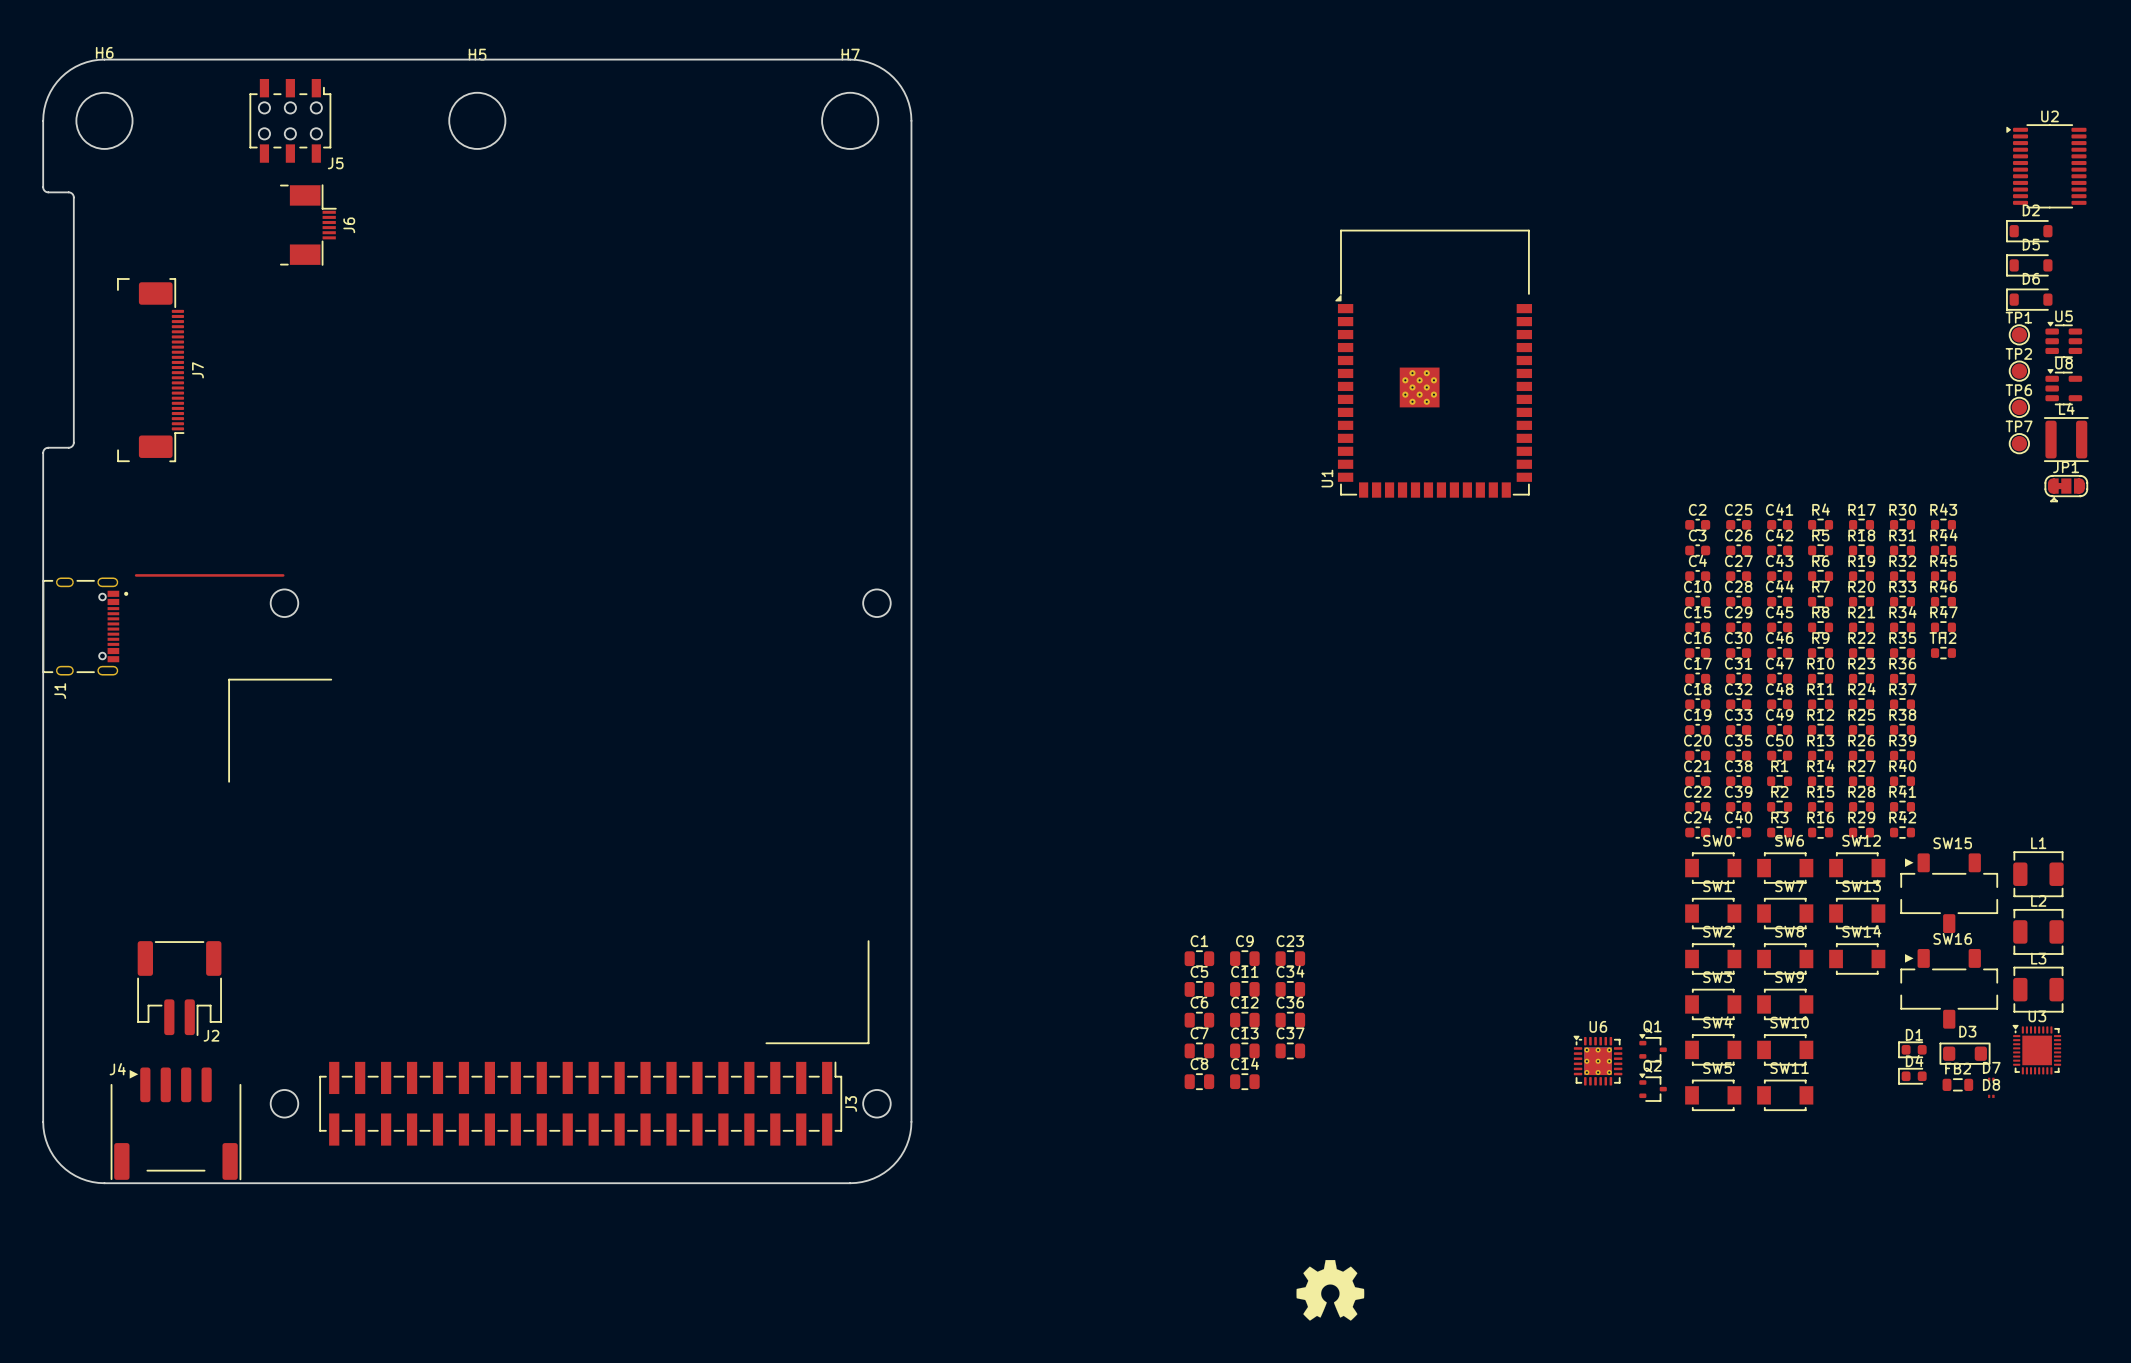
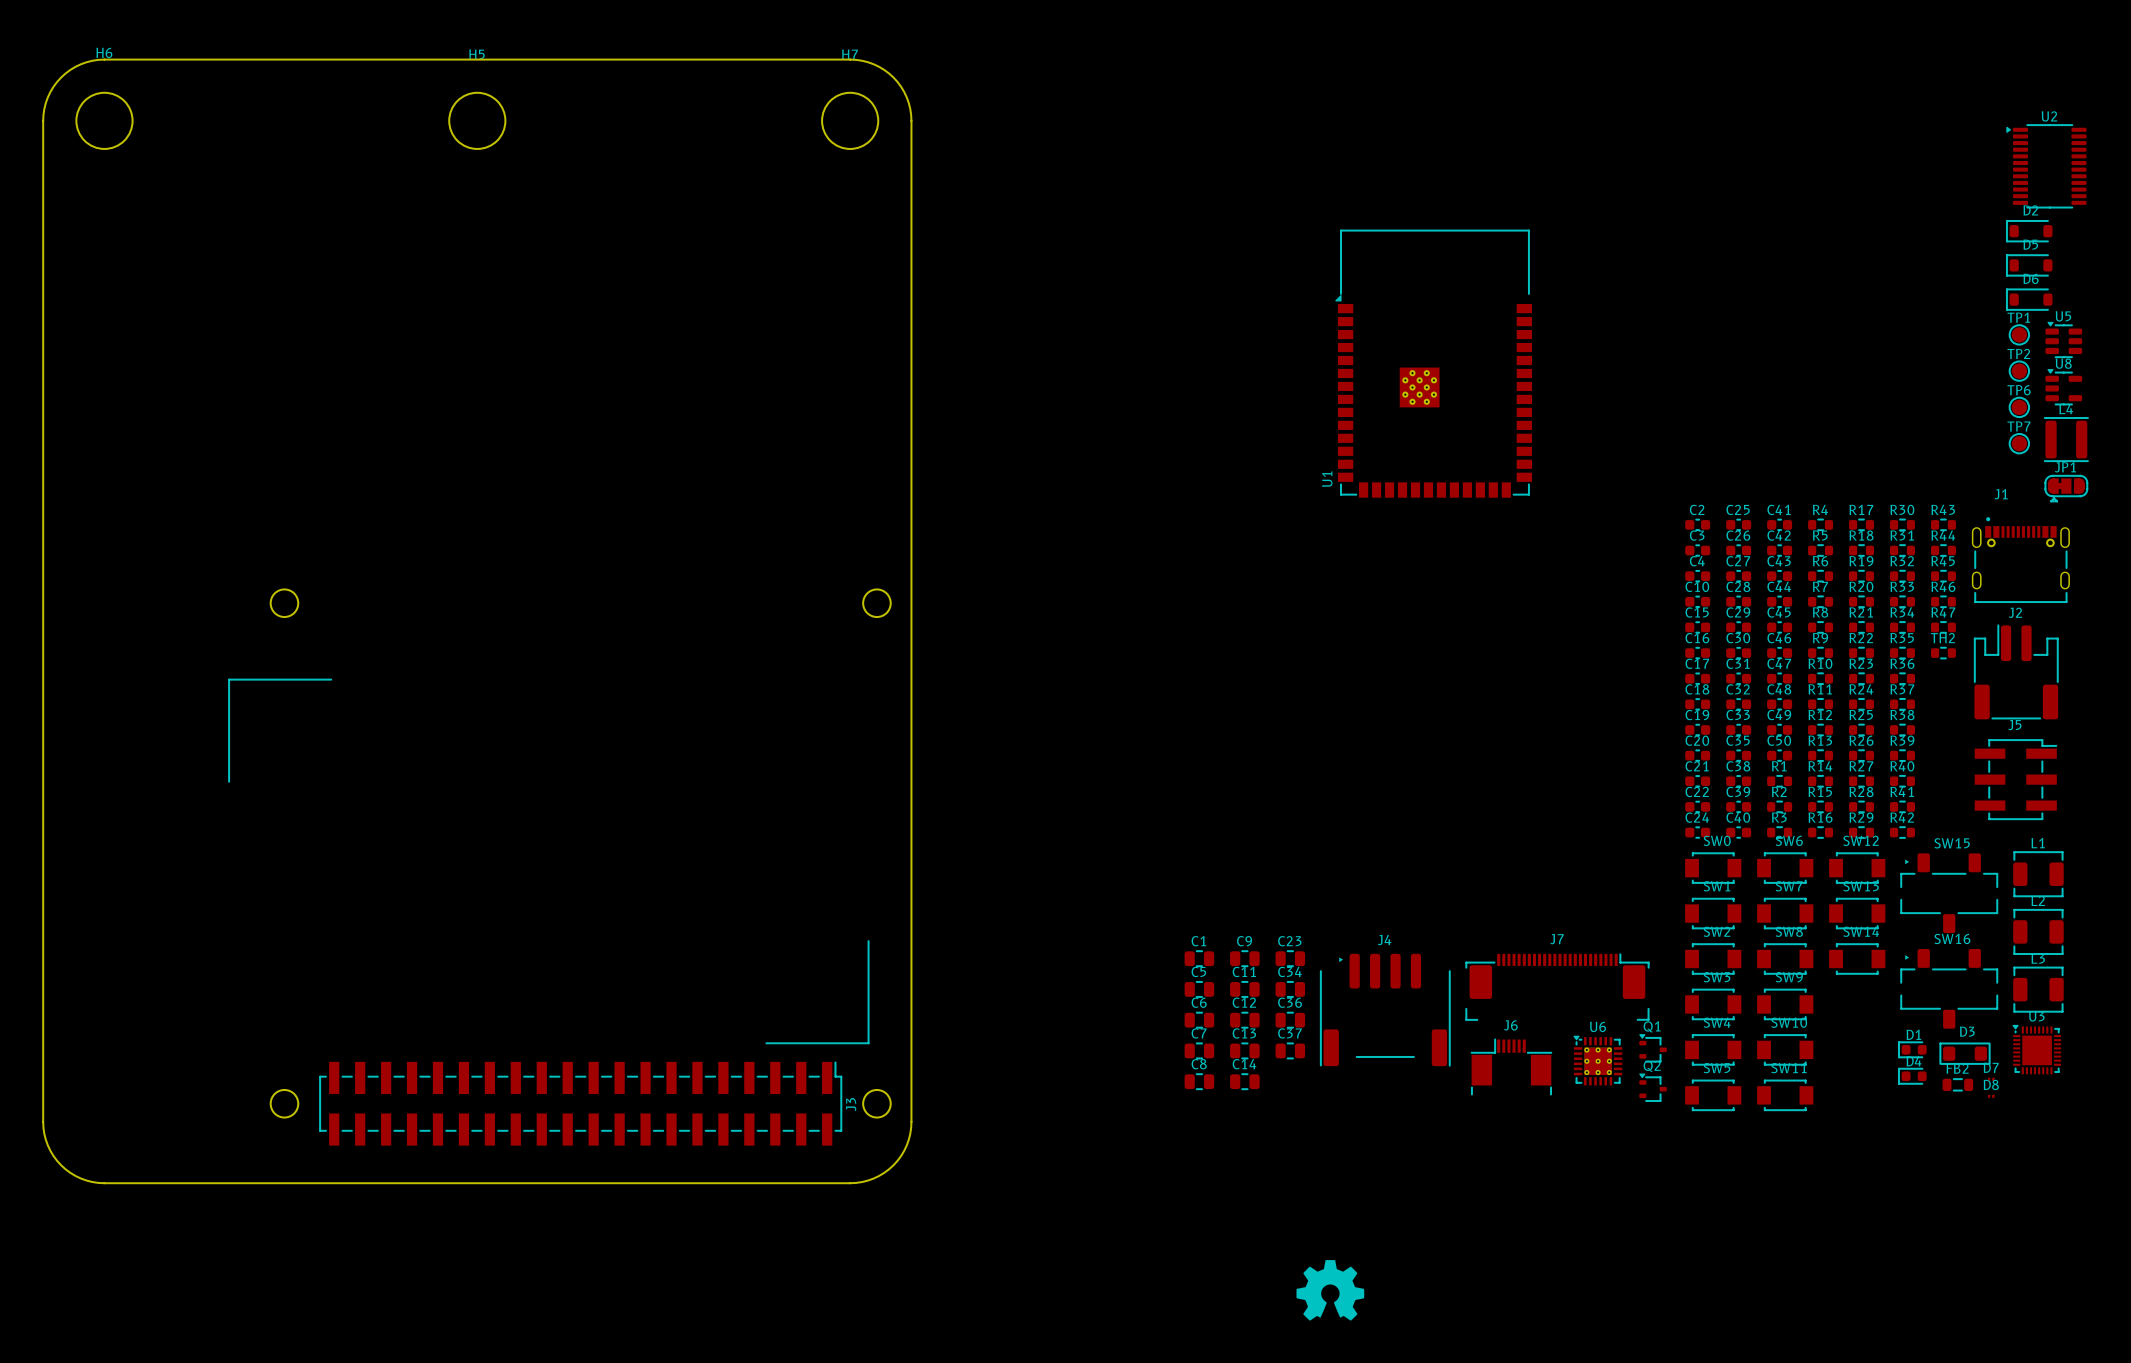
J5 footprint: [249, 78, 332, 163] -> [1974, 739, 2057, 820]
J5 name position: J5 (335, 163) -> J5 (2014, 725)
board edge: (43, 187) (47, 192) (70, 192) (73, 197) (73, 443) (69, 447) (46, 447) (43, 452) -> (43, 187) (43, 452)
J6 rotation: 0° (308, 225) -> 90° counterclockwise (1511, 1066)
J6 position: (308, 225) -> (1511, 1066)
J7 rotation: 0° (150, 370) -> 90° counterclockwise (1557, 987)
J7 position: (150, 370) -> (1557, 987)
top track: (136, 575) (283, 575) -> none
J1 rotation: 0° (85, 626) -> 90° counterclockwise (2020, 559)
J1 position: (85, 626) -> (2020, 559)
J1 name position: J1 (60, 691) -> J1 (2001, 494)
J2 rotation: 0° (179, 988) -> 180° (2016, 672)
J2 position: (179, 988) -> (2016, 672)
J2 name position: J2 (211, 1035) -> J2 (2015, 612)
J4 name position: J4 (117, 1069) -> J4 (1384, 940)
J4 position: (175, 1123) -> (1385, 1010)

